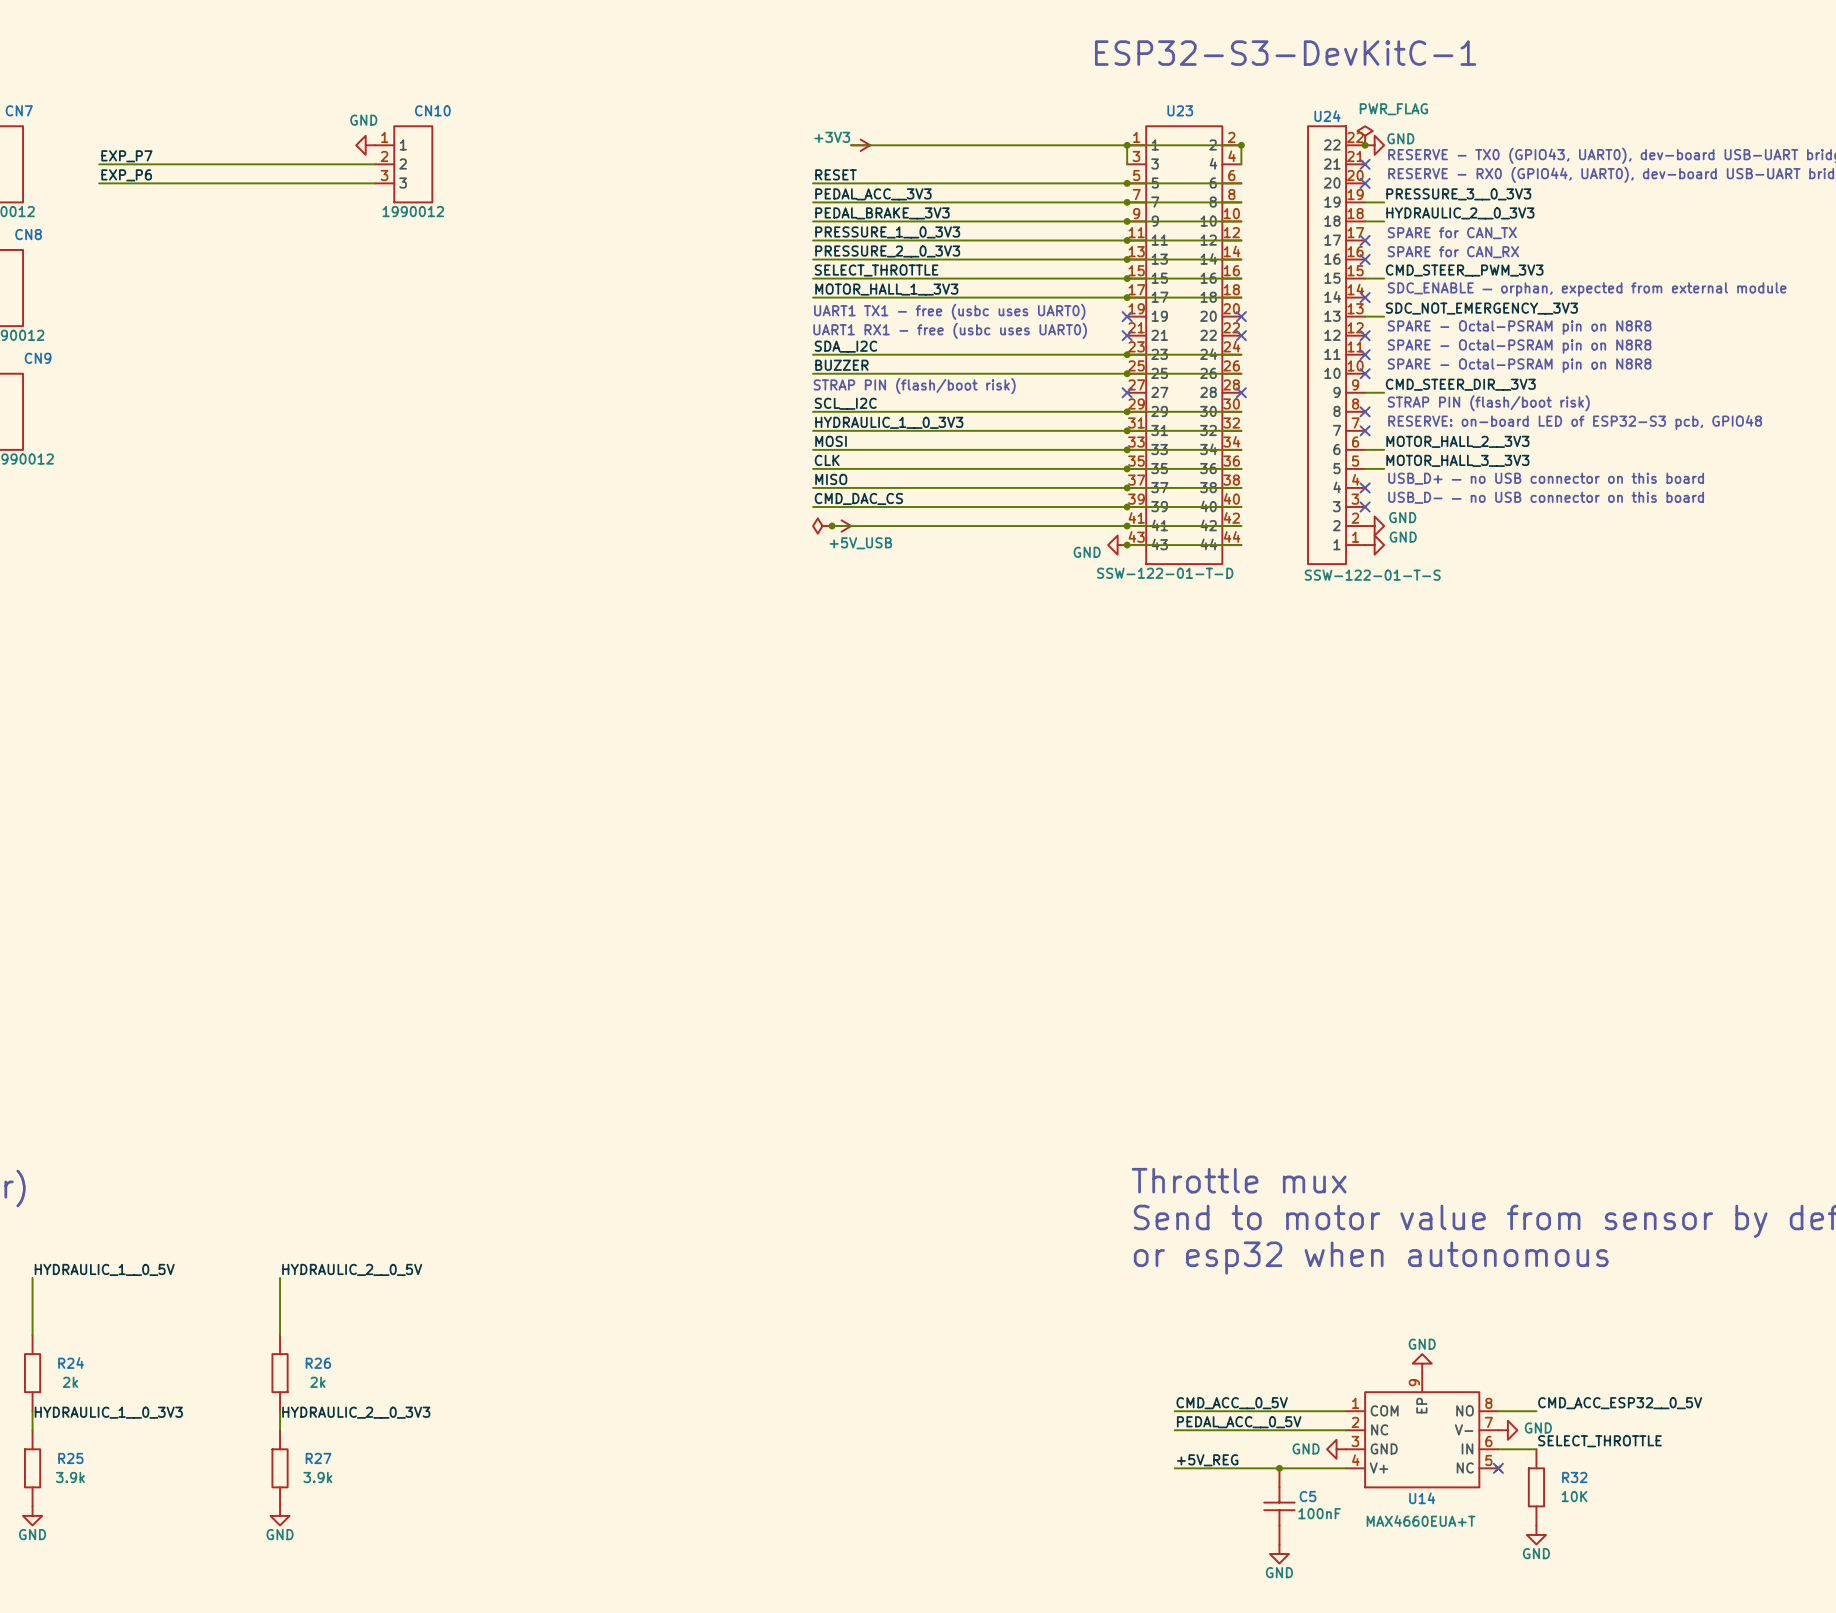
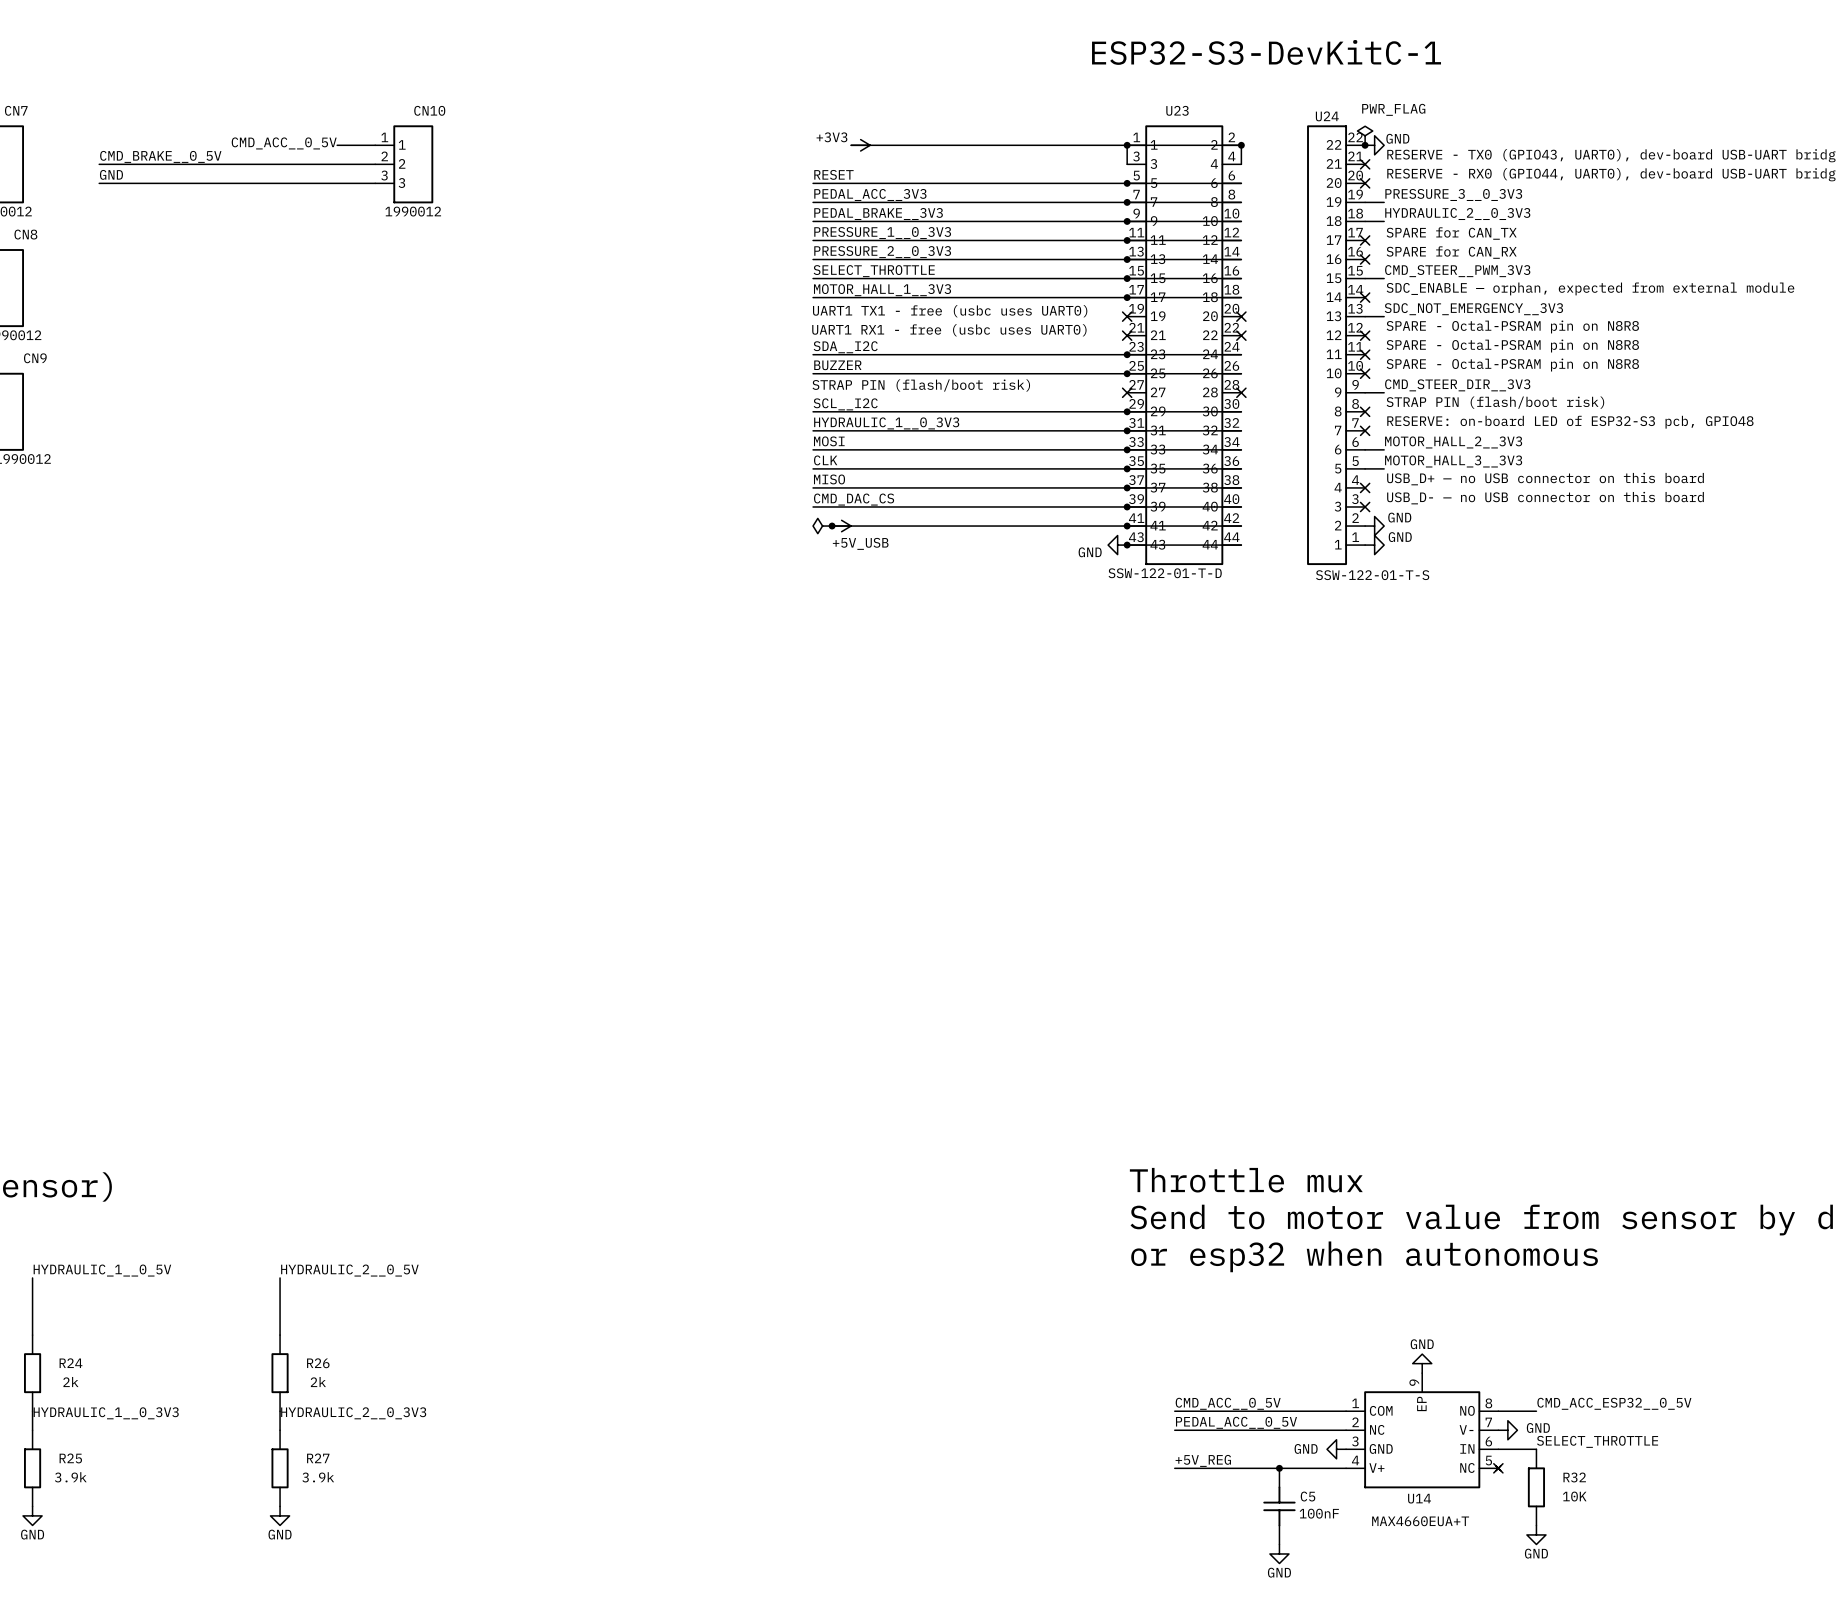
label: none -> CMD_ACC__0_5V (284, 143)
wire: none -> (337, 145) (375, 145)
power symbol: GND (365, 145) -> none
label: EXP_P7 (126, 156) -> CMD_BRAKE__0_5V (160, 156)
label: EXP_P6 (126, 175) -> GND (111, 174)

